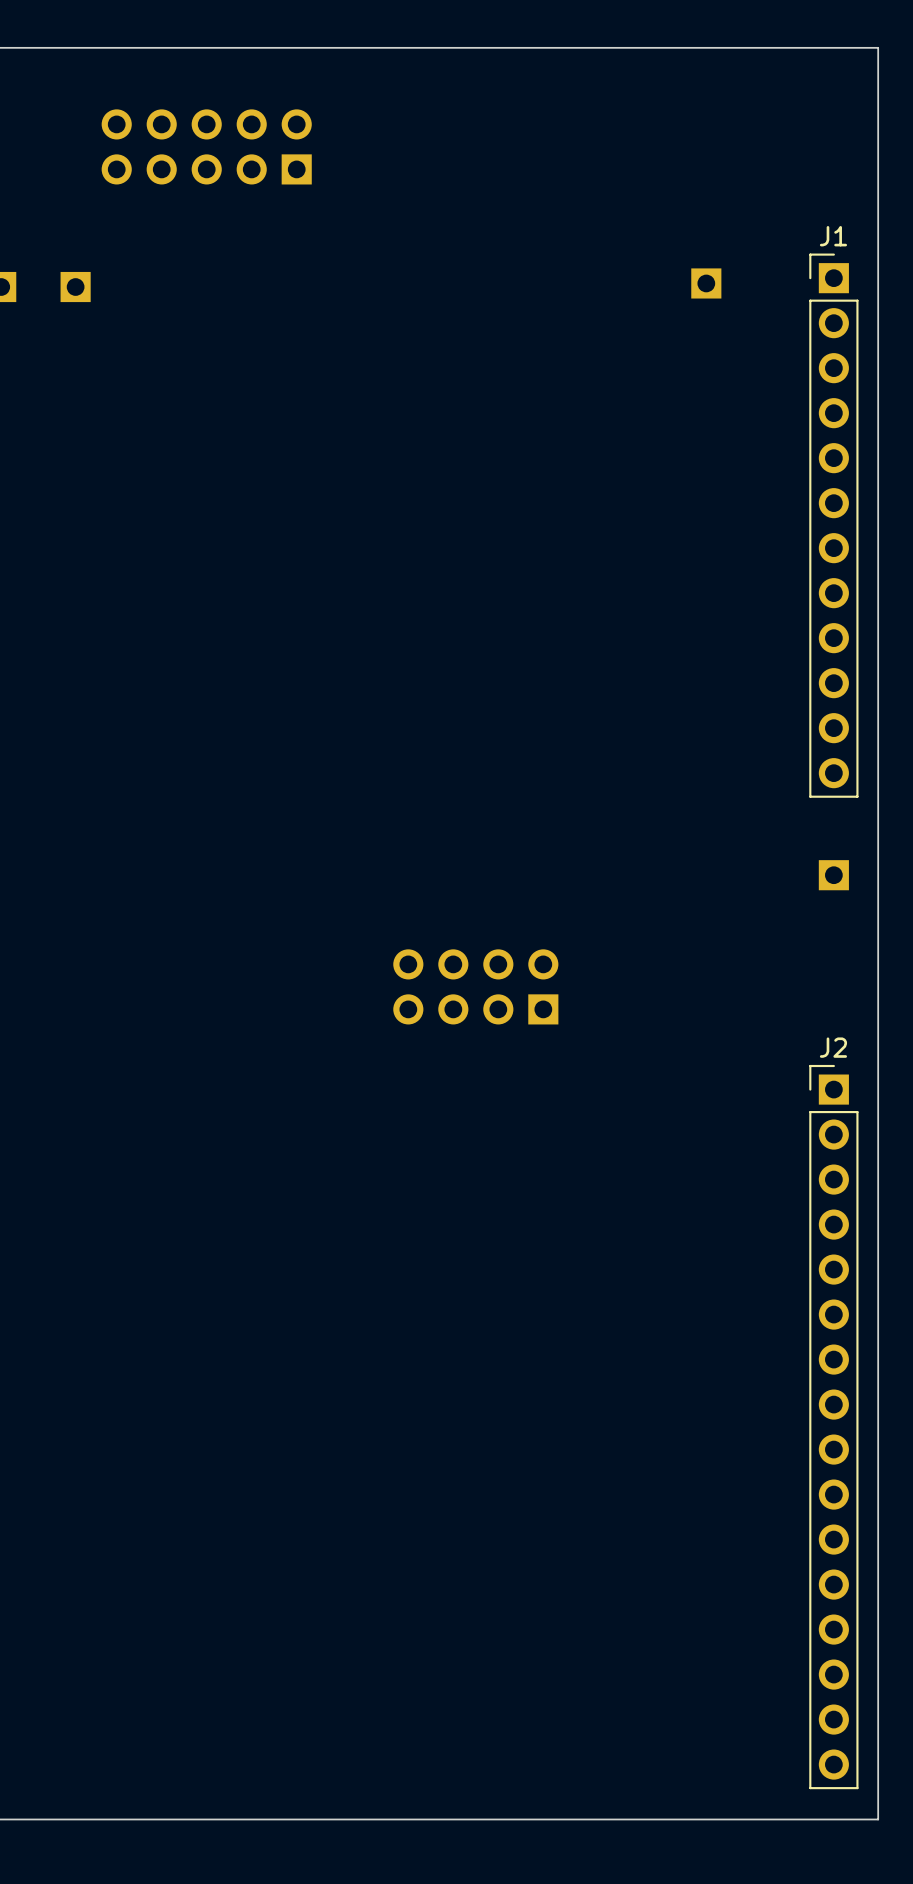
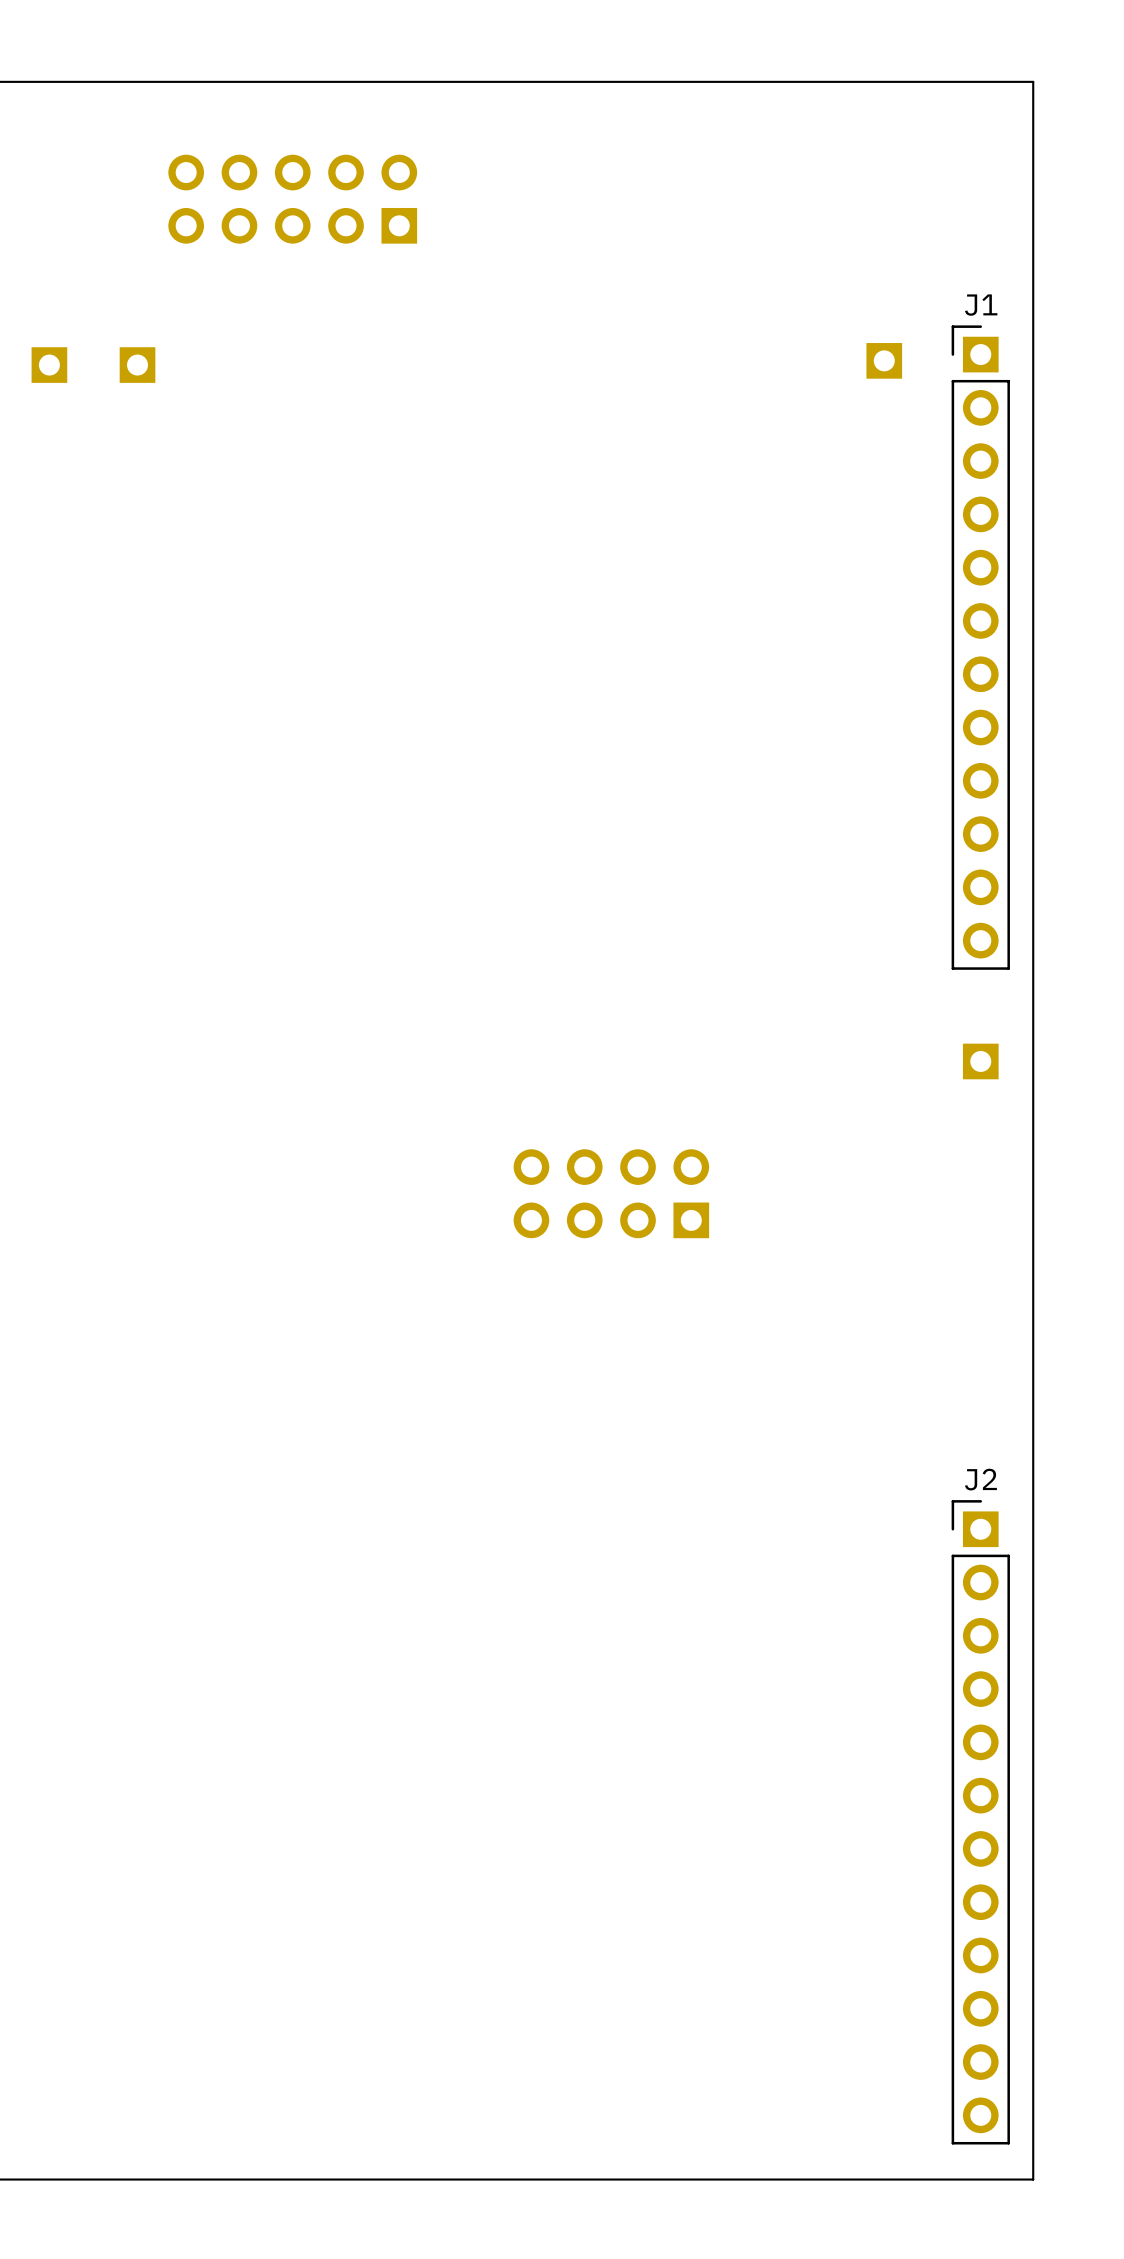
board edge: (832, 47) (878, 47) (878, 1819) (832, 1819) -> (1033, 81) (1033, 2179)
J1 position: (833, 525) -> (980, 647)
part position: (833, 875) -> (980, 1061)
J2 name position: J2 (833, 1047) -> J2 (980, 1479)
J2 footprint: [809, 1064, 859, 1790] -> [951, 1500, 1010, 2145]

